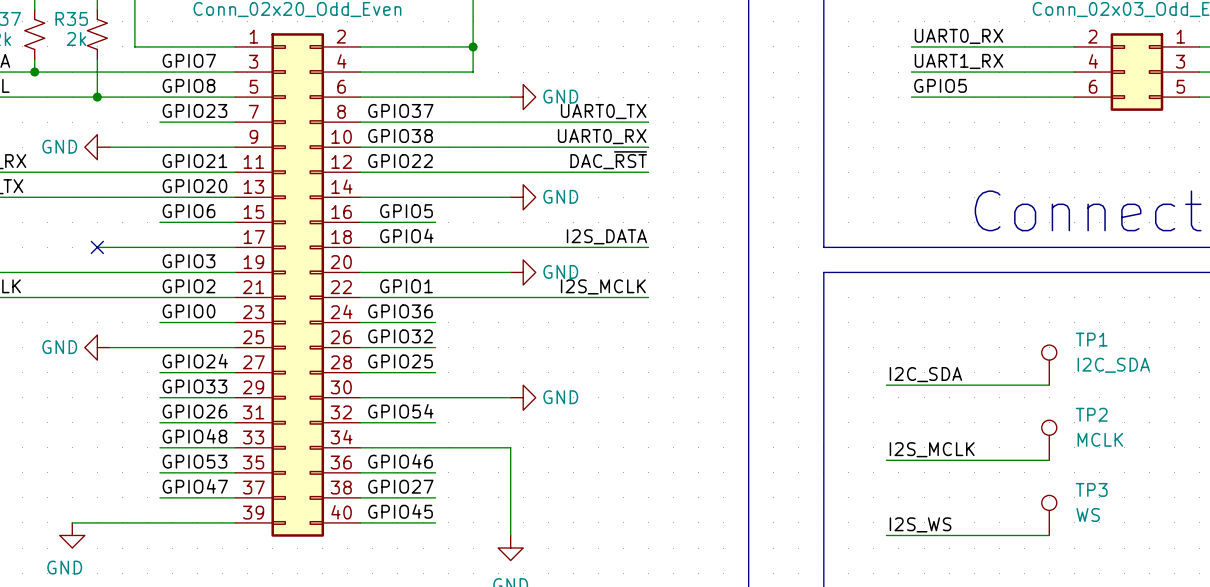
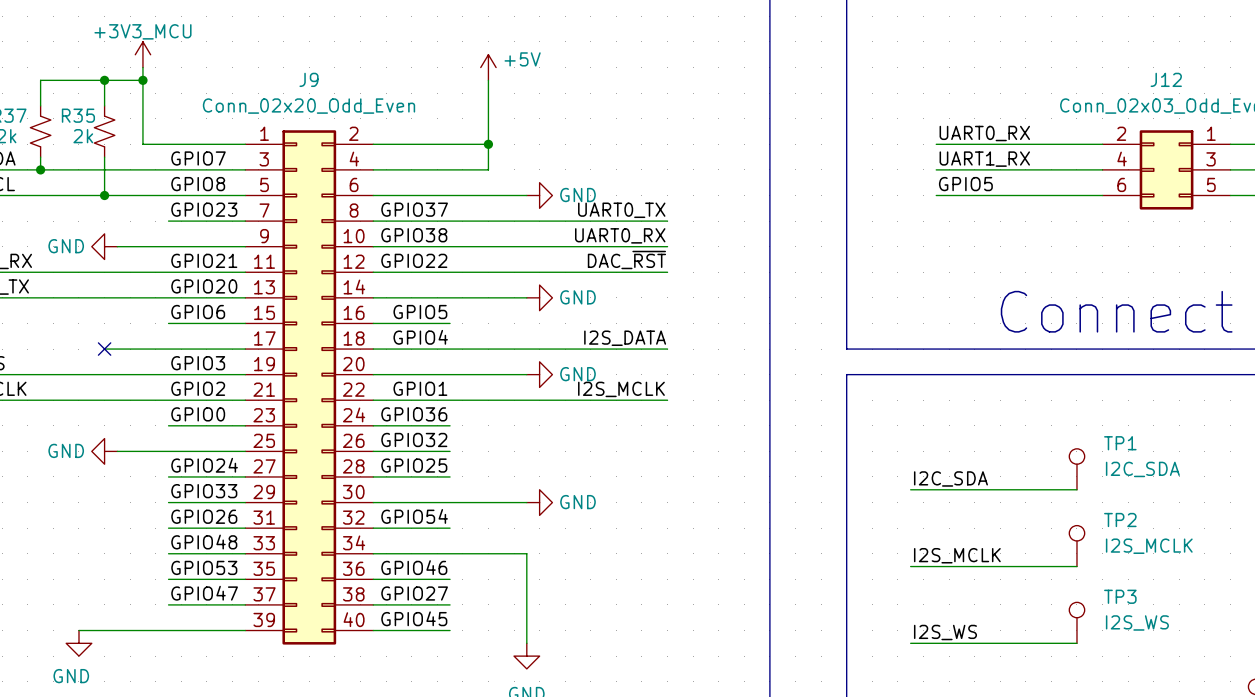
TP2 value: MCLK (1100, 439) -> I2S_MCLK (1149, 546)
TP3 value: WS (1088, 514) -> I2S_WS (1137, 622)

